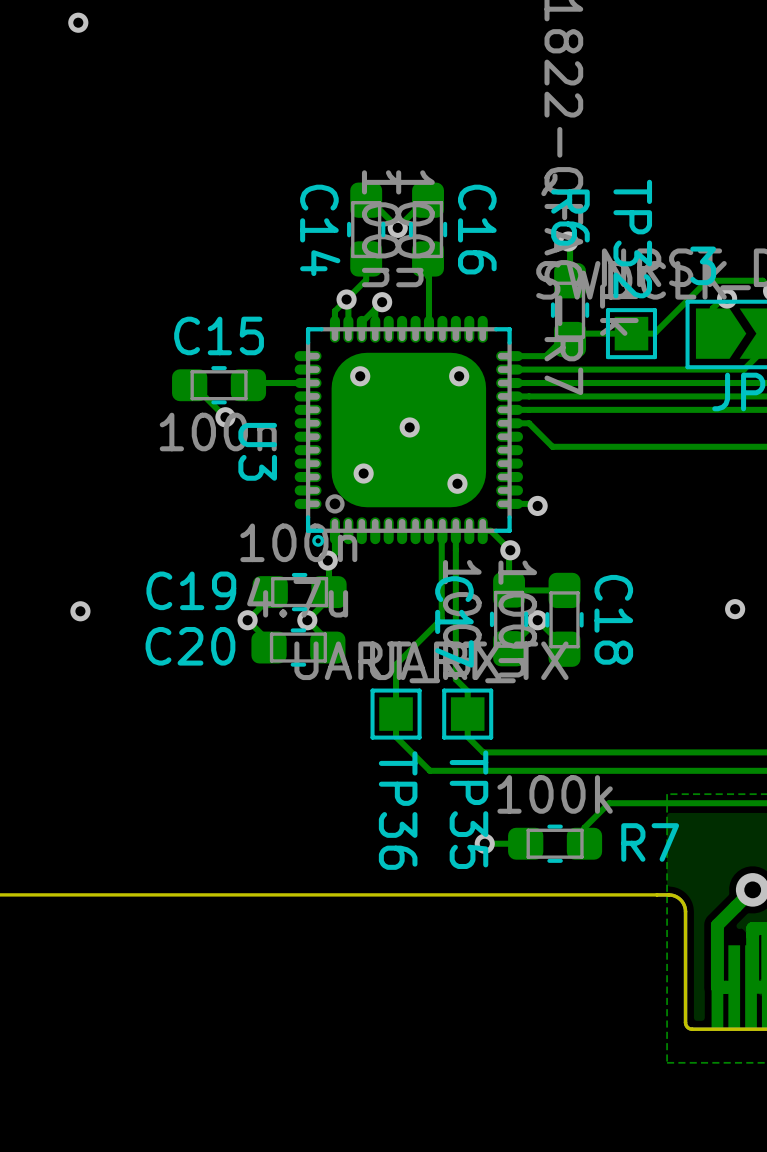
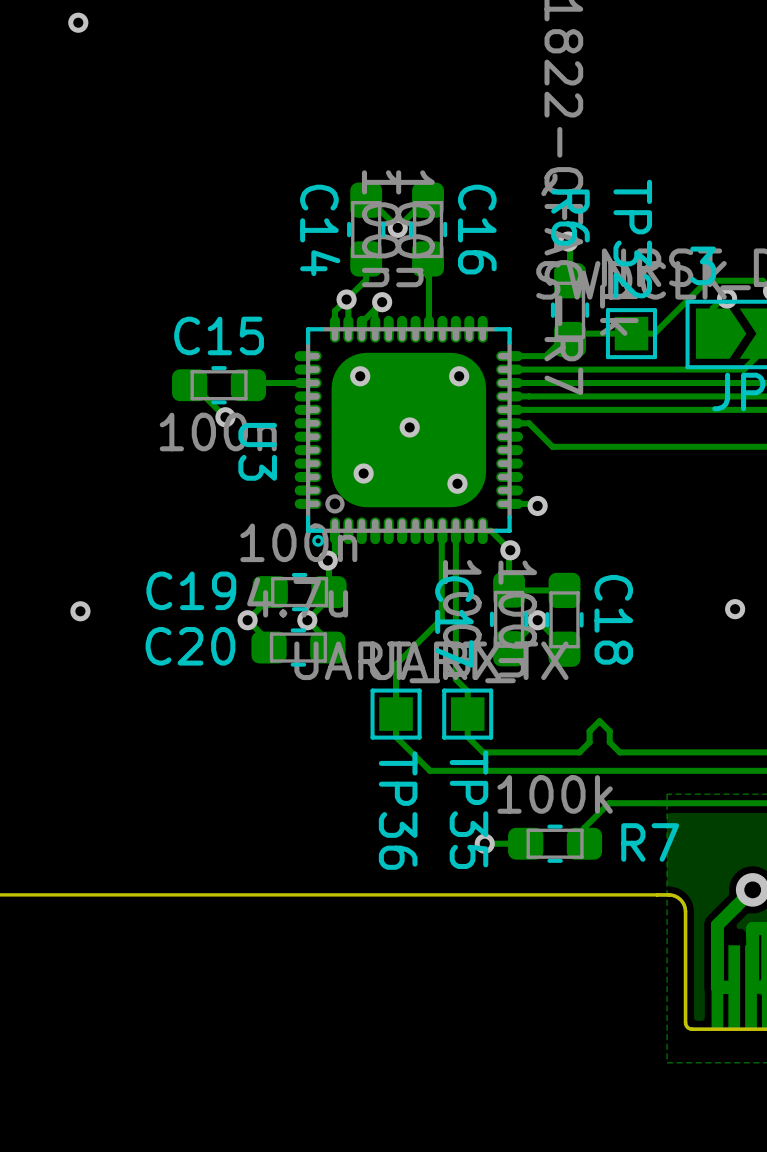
track: (619, 752) (579, 752) -> (619, 752) (609, 742) (609, 731) (599, 721) (589, 731) (589, 742) (579, 752)

